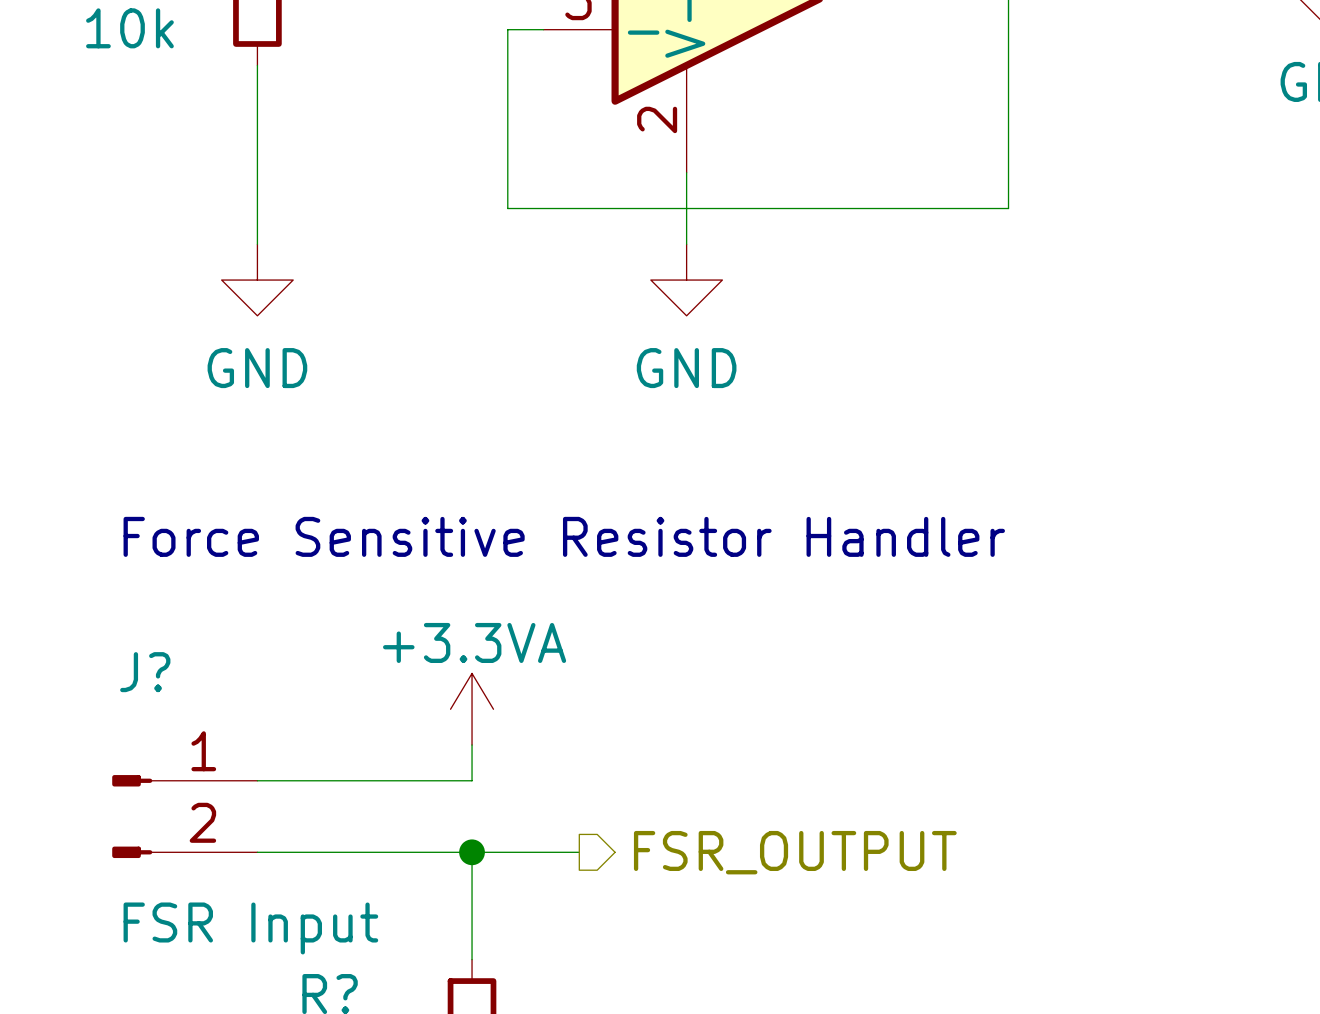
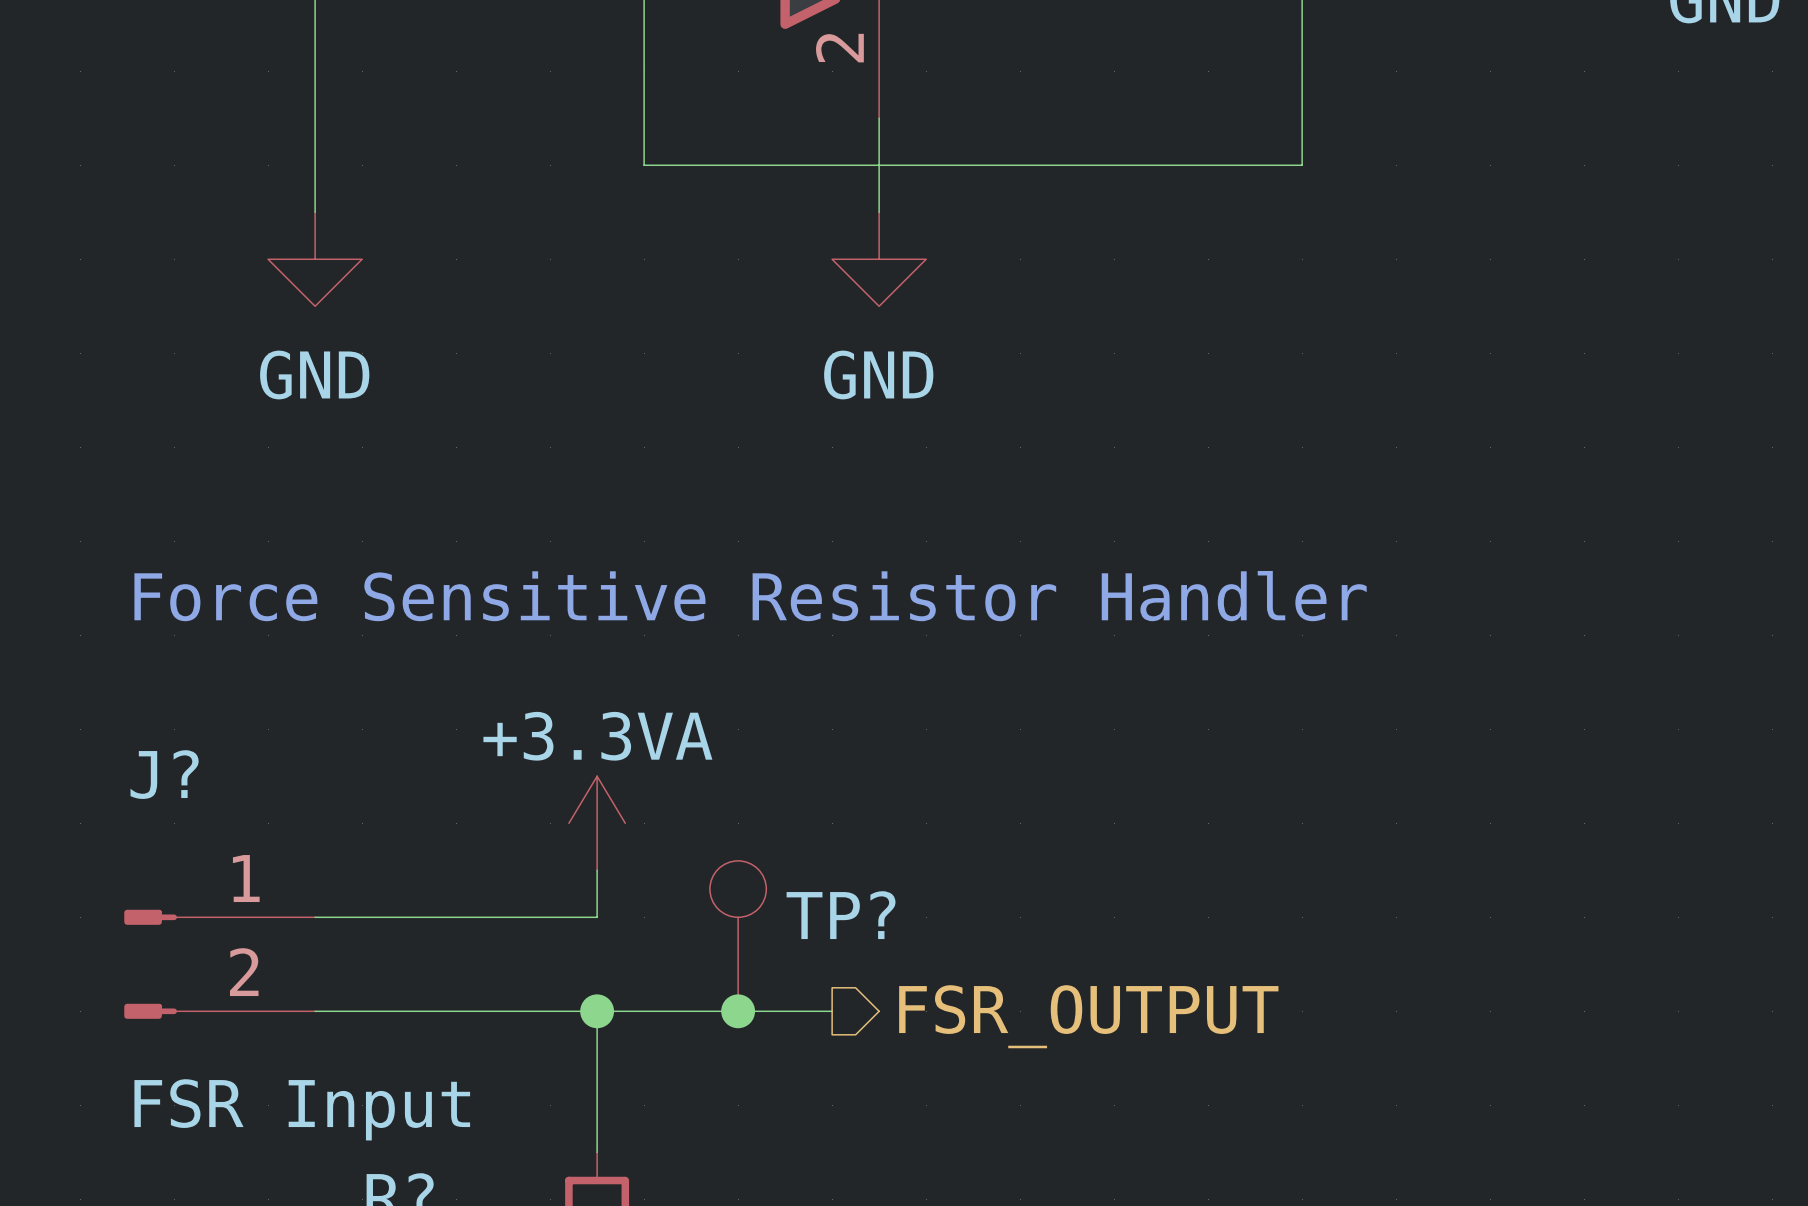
TP?: none -> (738, 936)
wire: none -> (738, 1011) (832, 1011)
junction: none -> (738, 1011)
hierarchical label position: FSR_OUTPUT (795, 852) -> FSR_OUTPUT (1088, 1016)

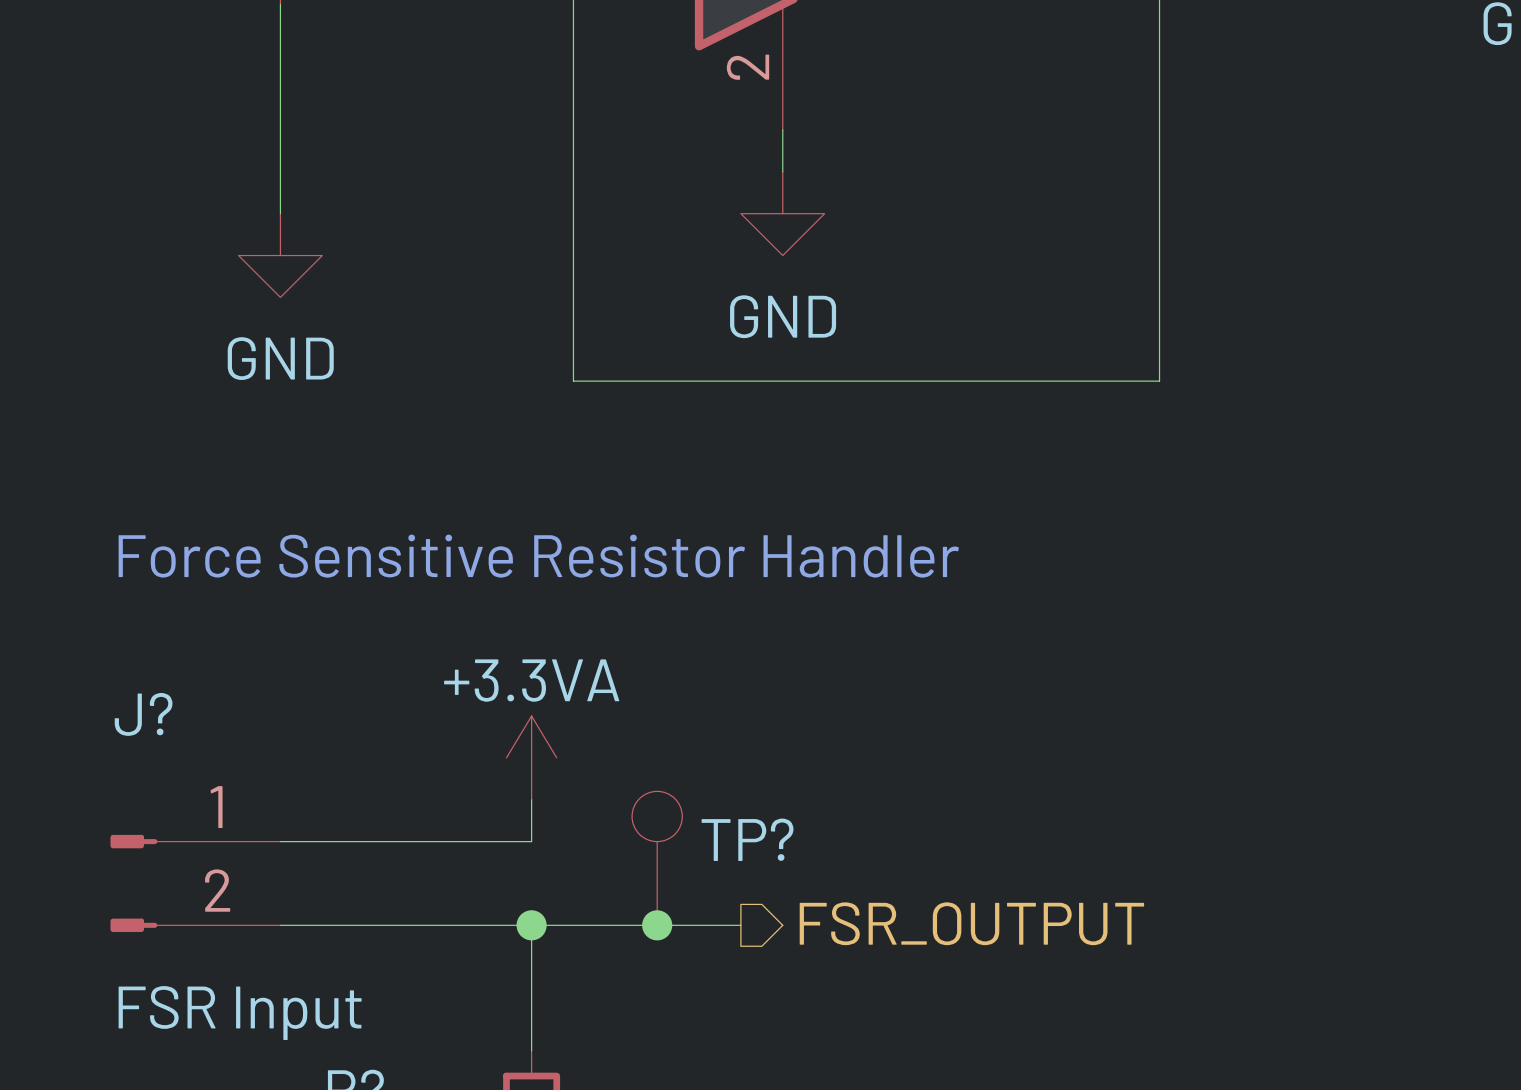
wire: (644, 165) (1302, 165) -> (573, 171) (573, 381) (1159, 381) (1159, 171)
power symbol position: GND (879, 259) -> GND (782, 213)

